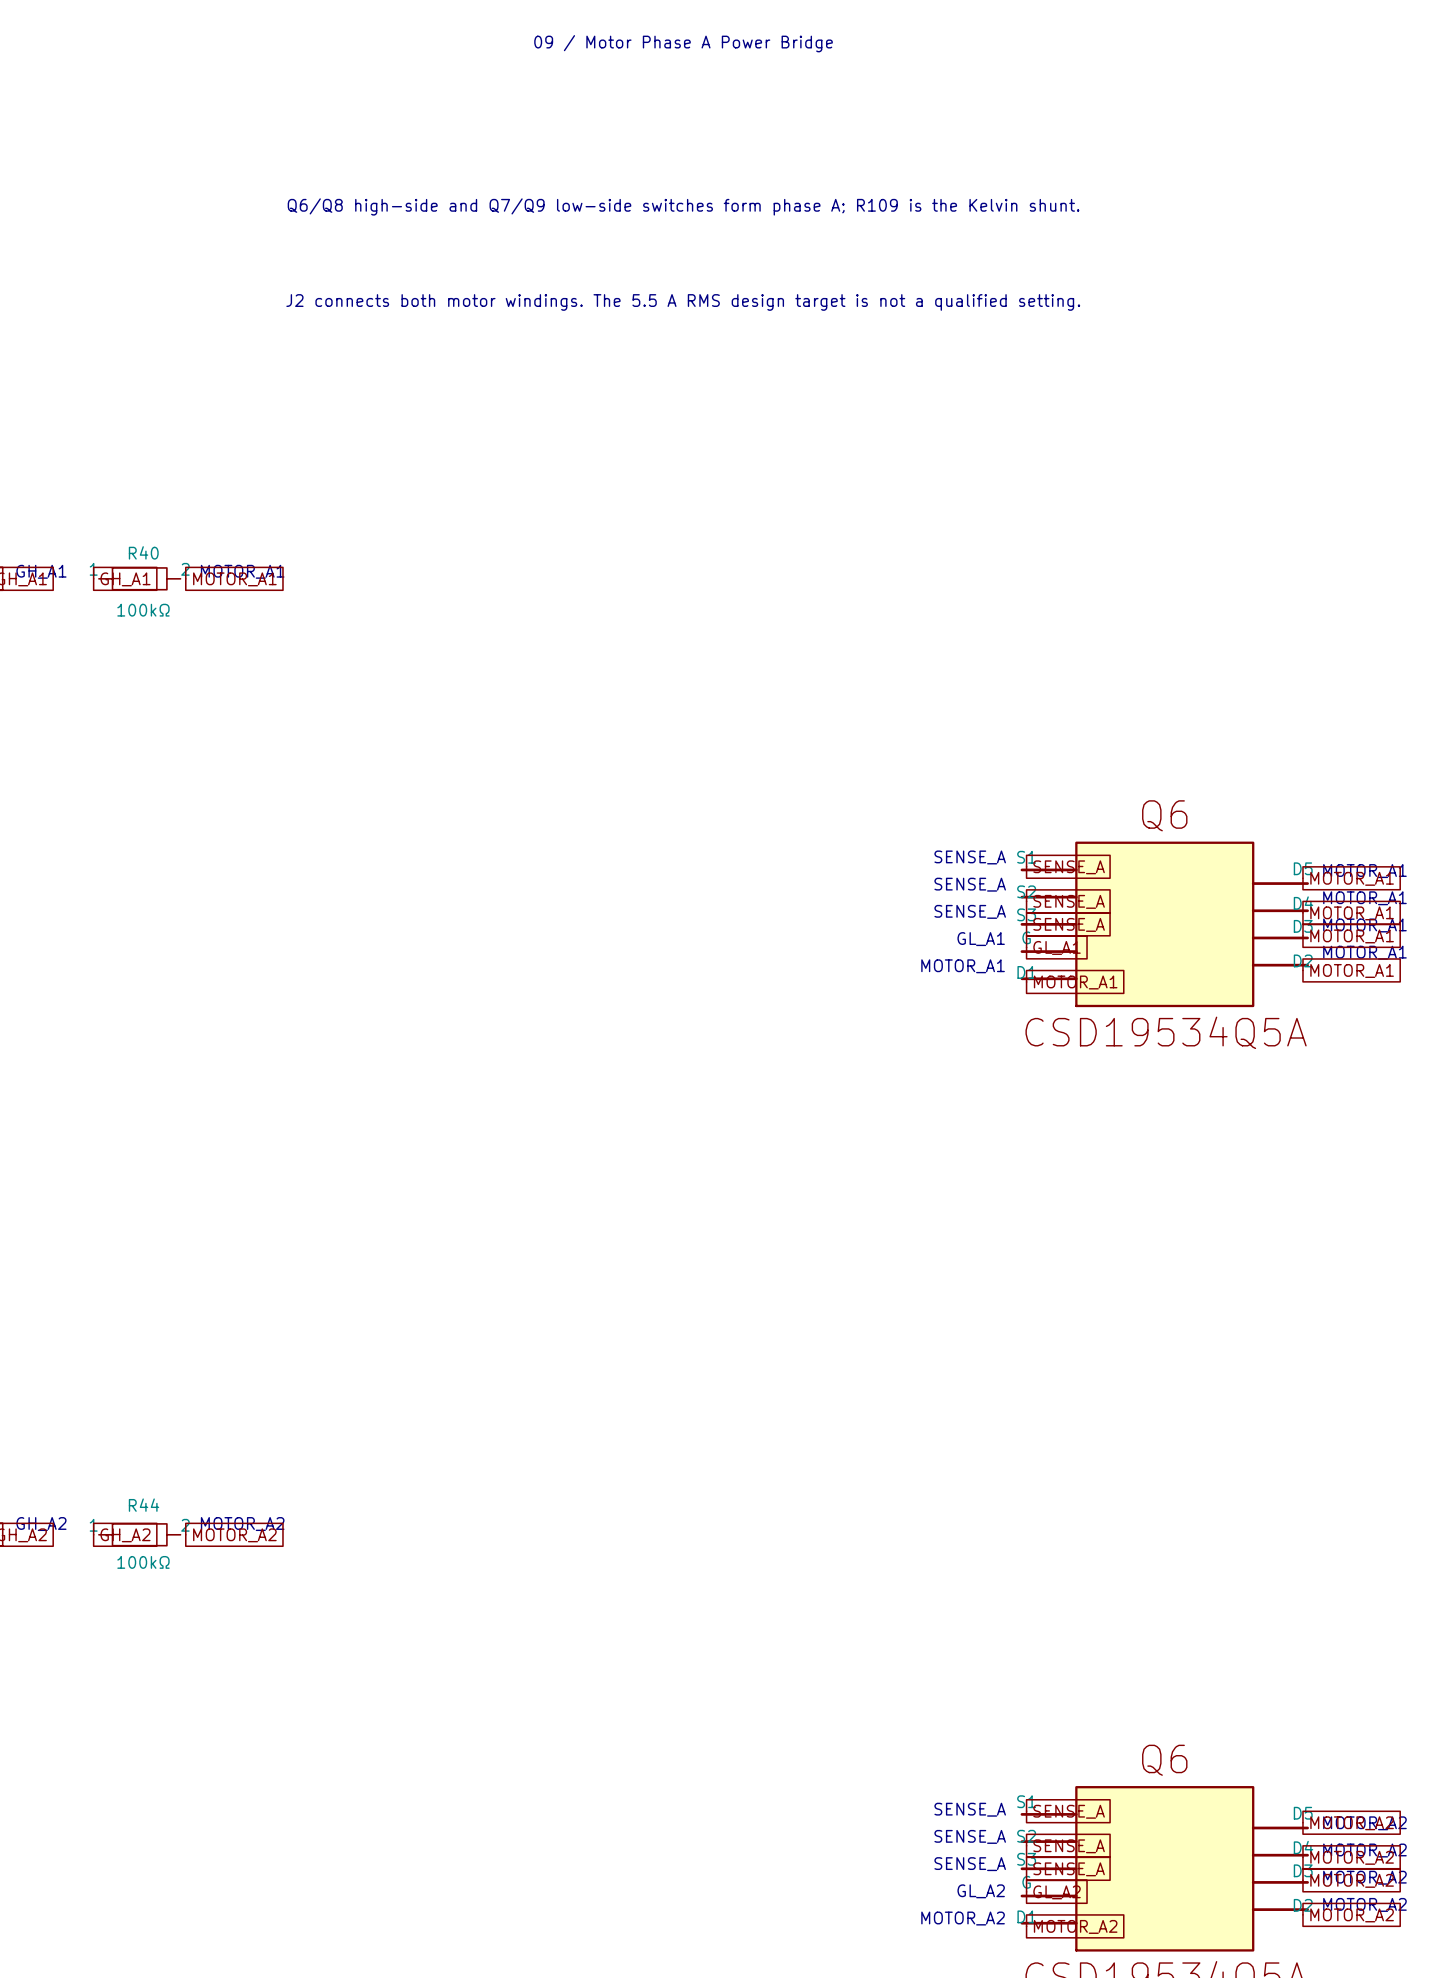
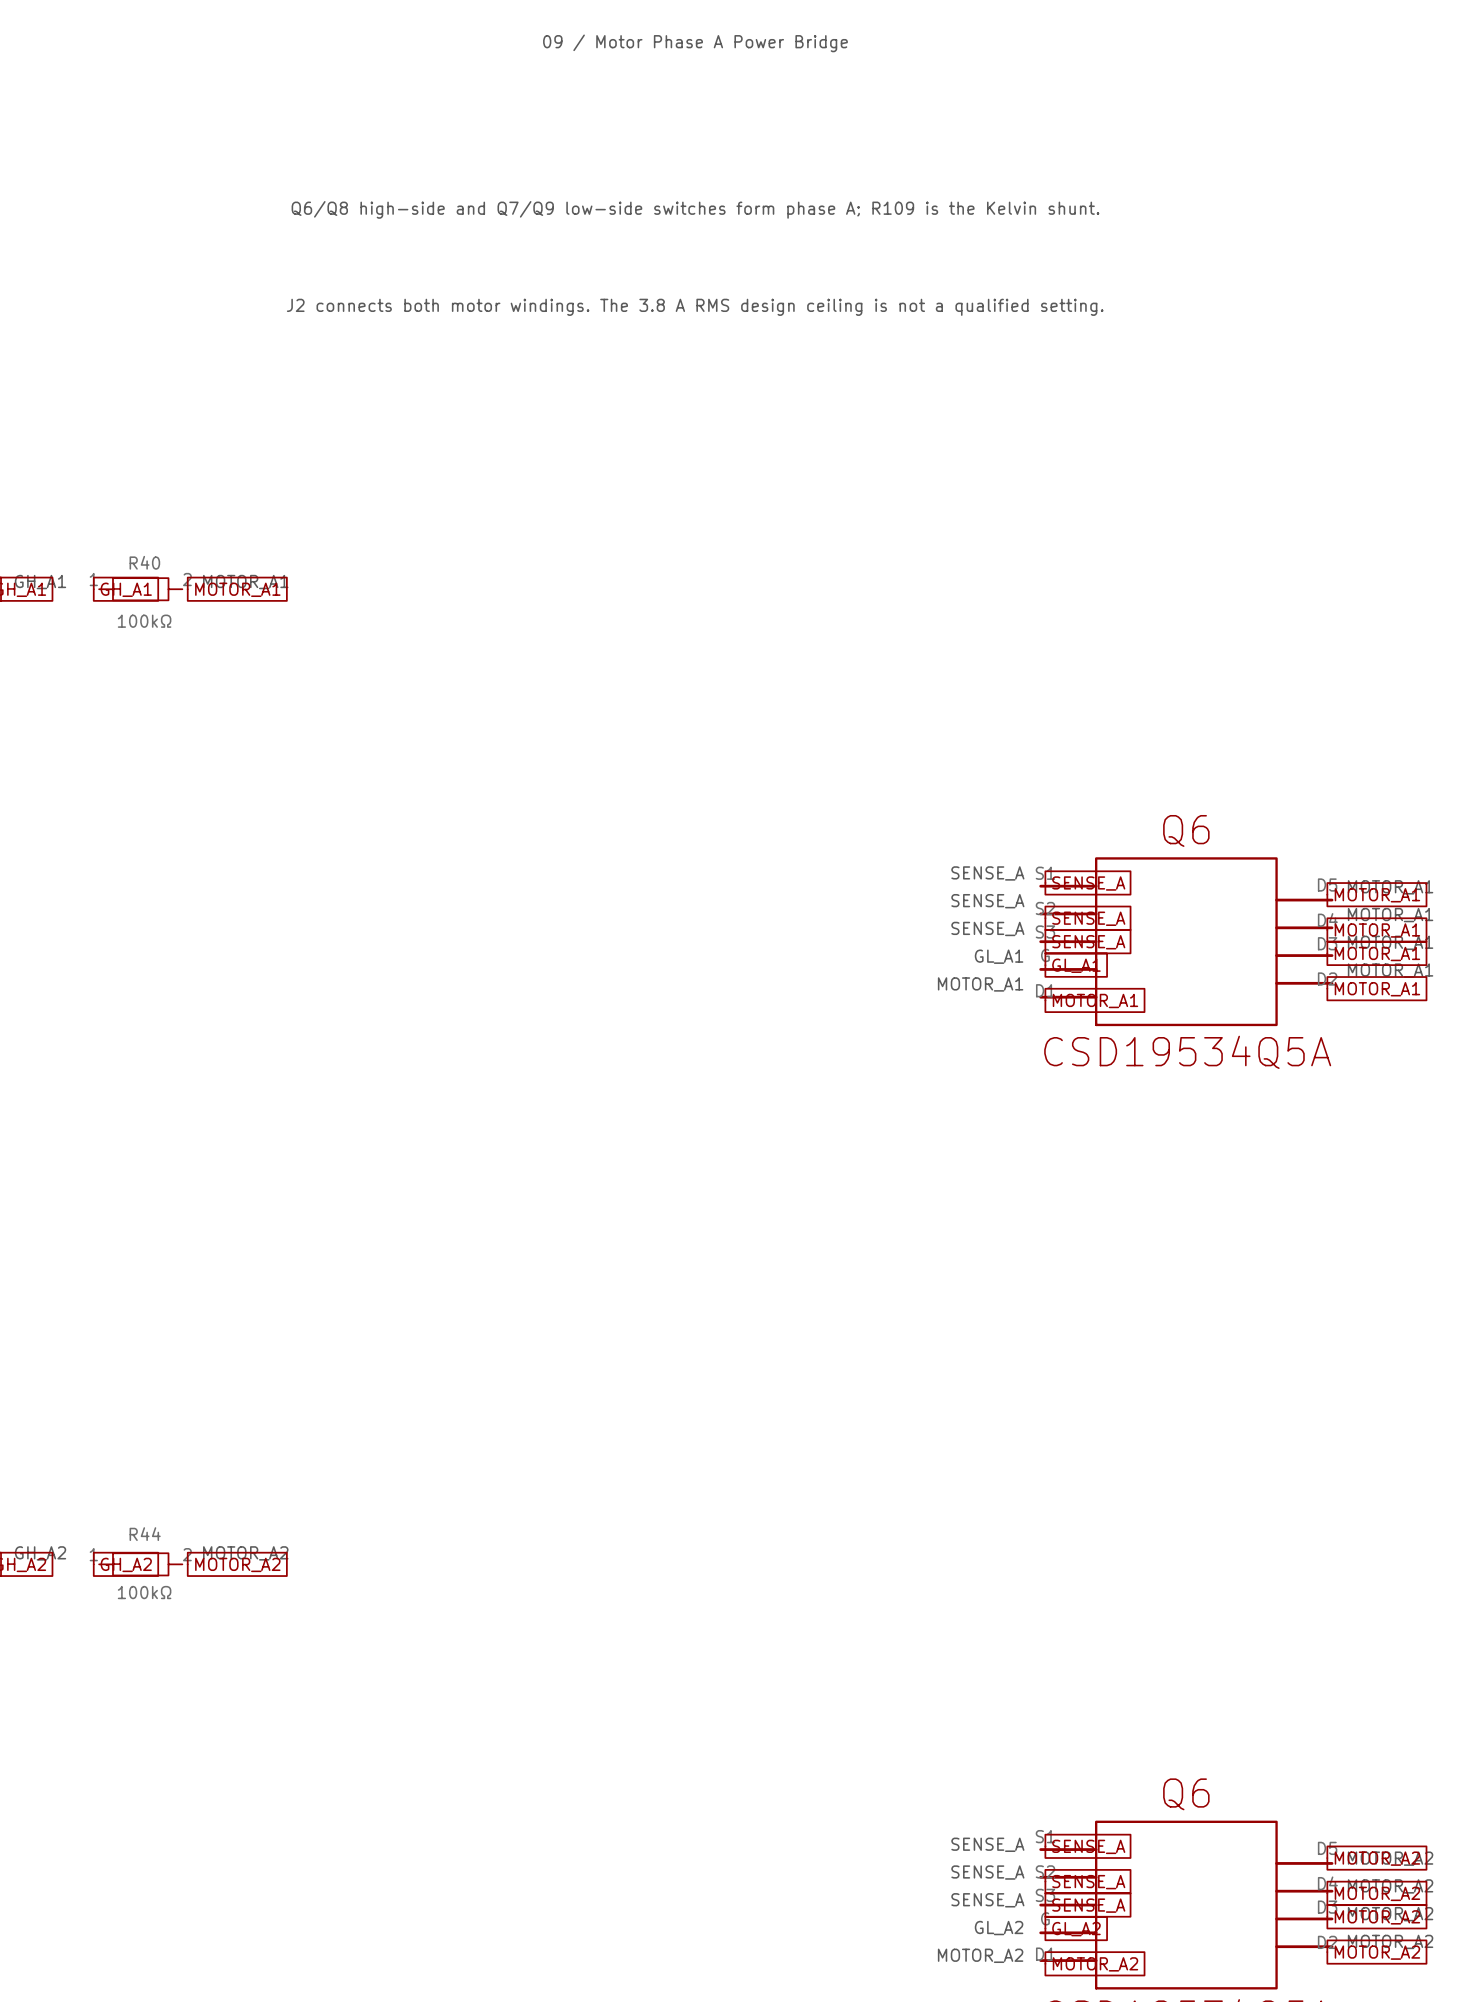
text: J2 connects both motor windings. The 5.5 A RMS design target is not a qualified setting. (683, 302) -> J2 connects both motor windings. The 3.8 A RMS design ceiling is not a qualified setting. (695, 307)

